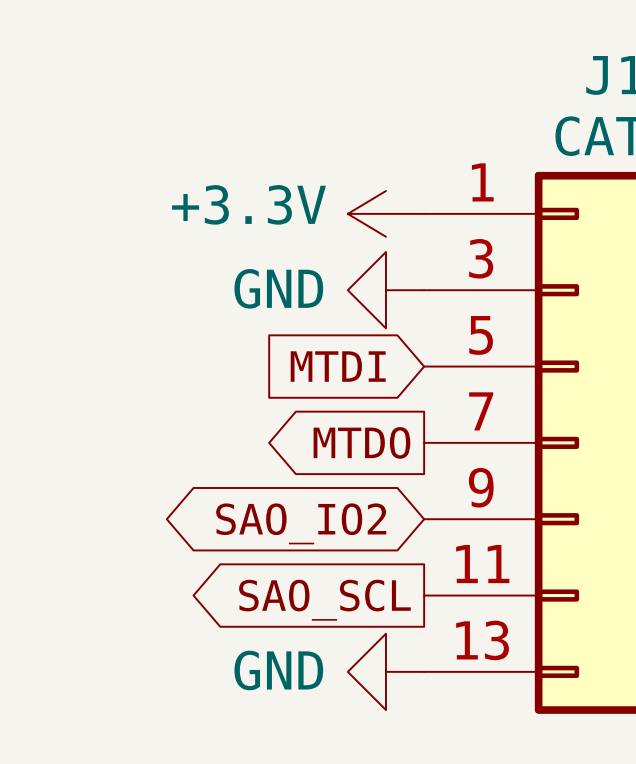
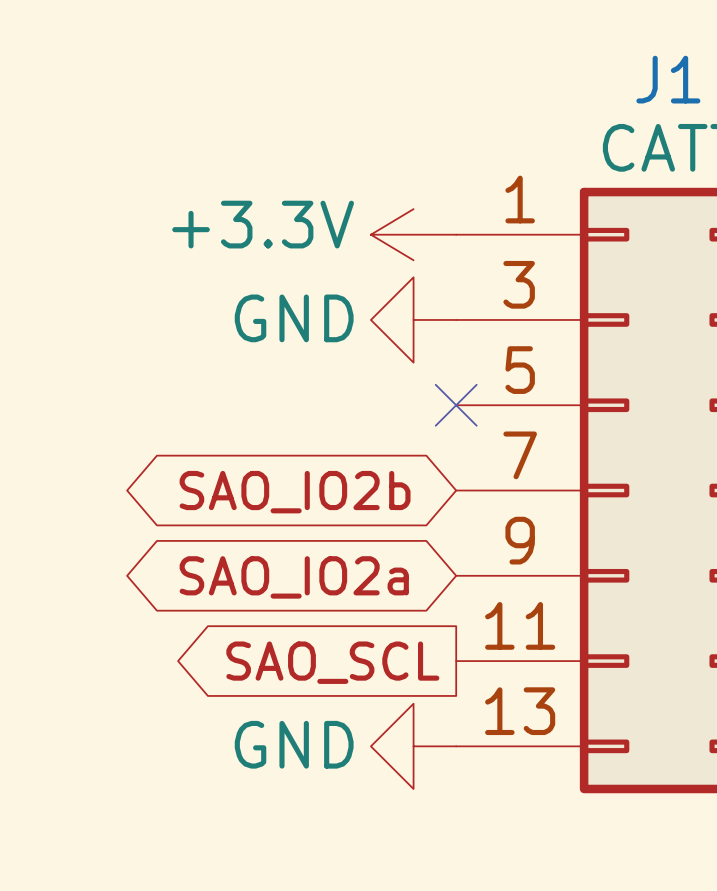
global label: MTDI (338, 366) -> none
no-connect mark: none -> (456, 405)
global label shape: output (361, 442) -> bidirectional (295, 492)
global label: MTDO (361, 442) -> SAO_IO2b (295, 492)
global label: SAO_IO2 (301, 523) -> SAO_IO2a (294, 577)

